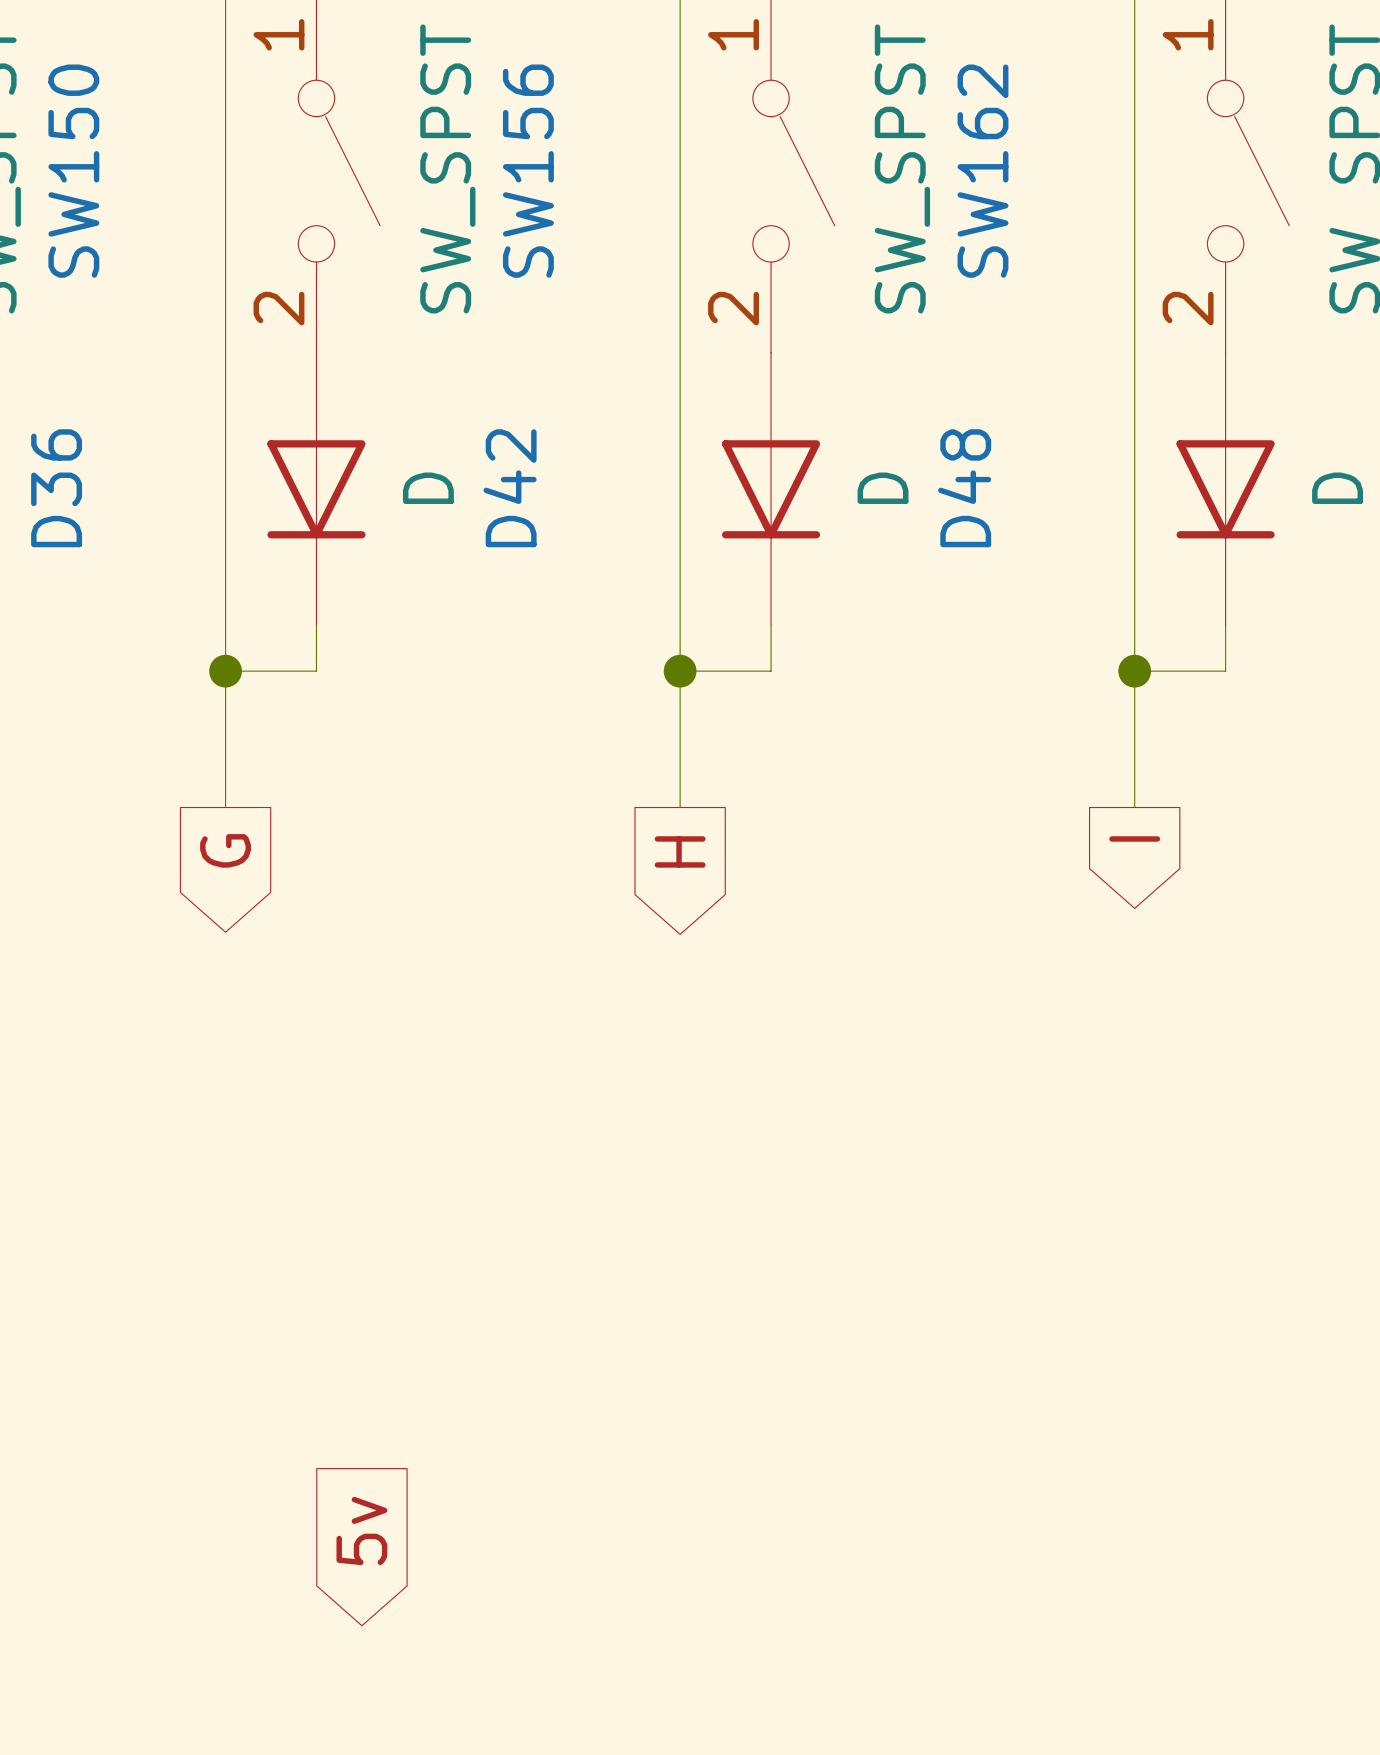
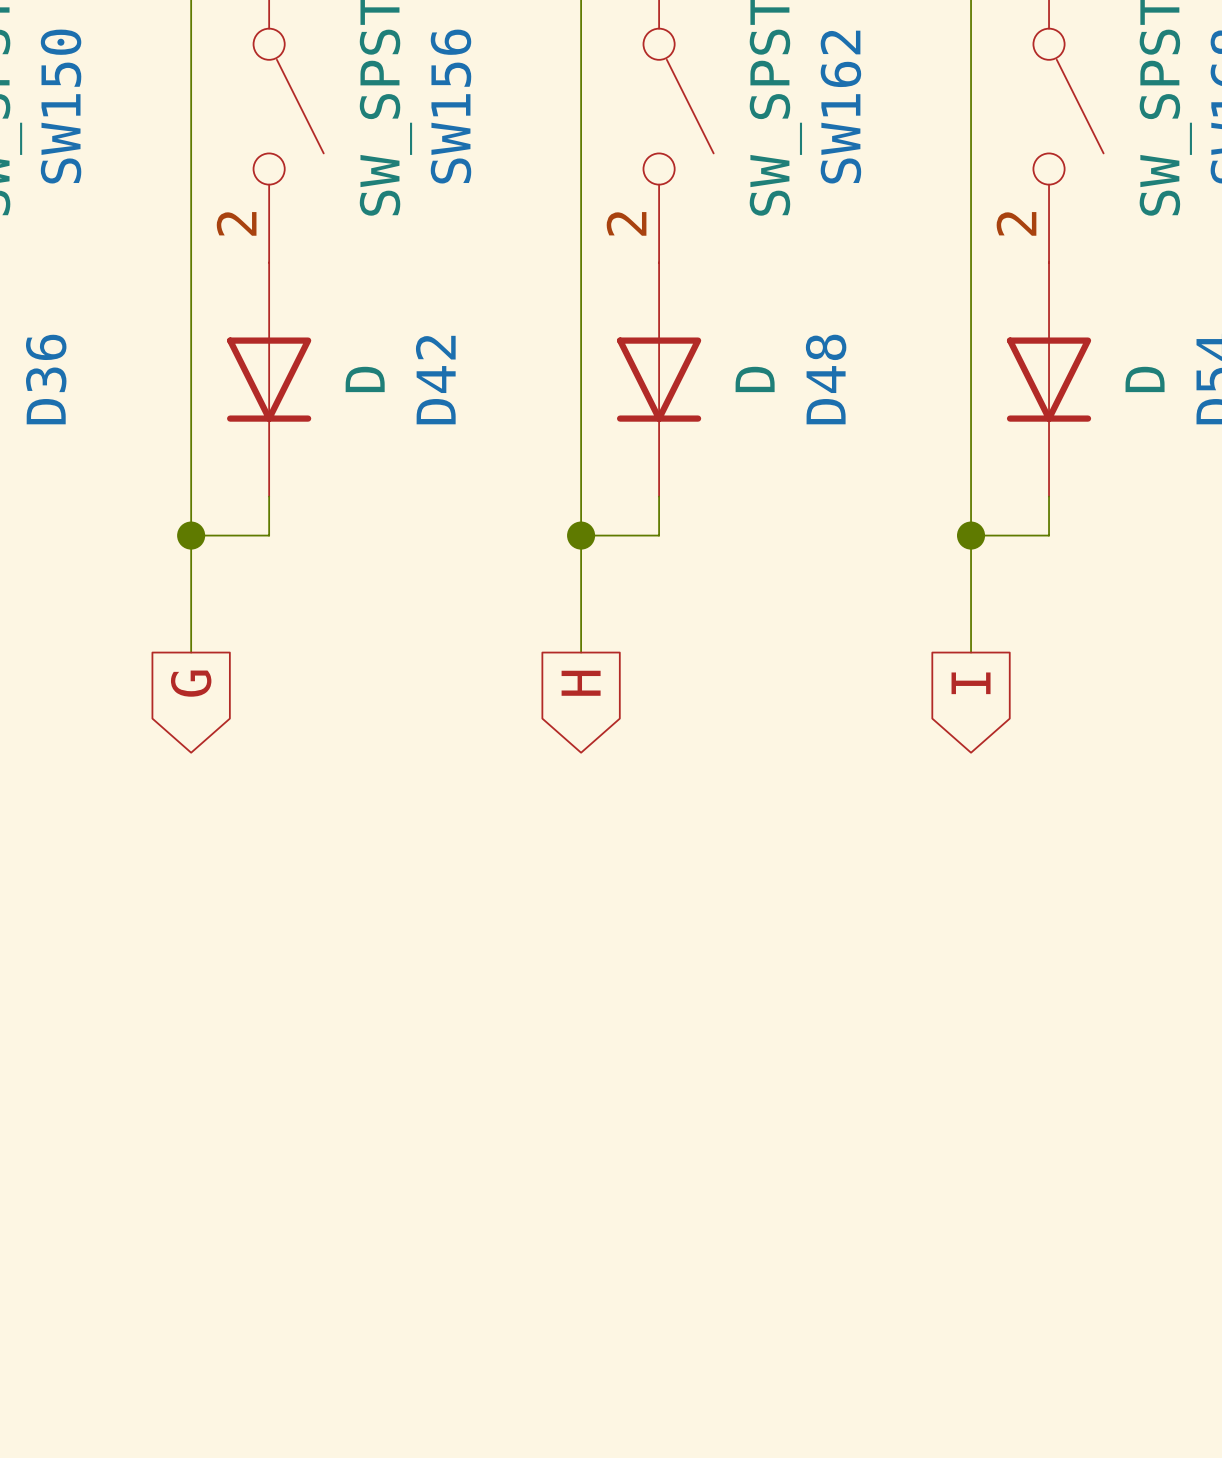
global label: 5v (361, 1530) -> none

